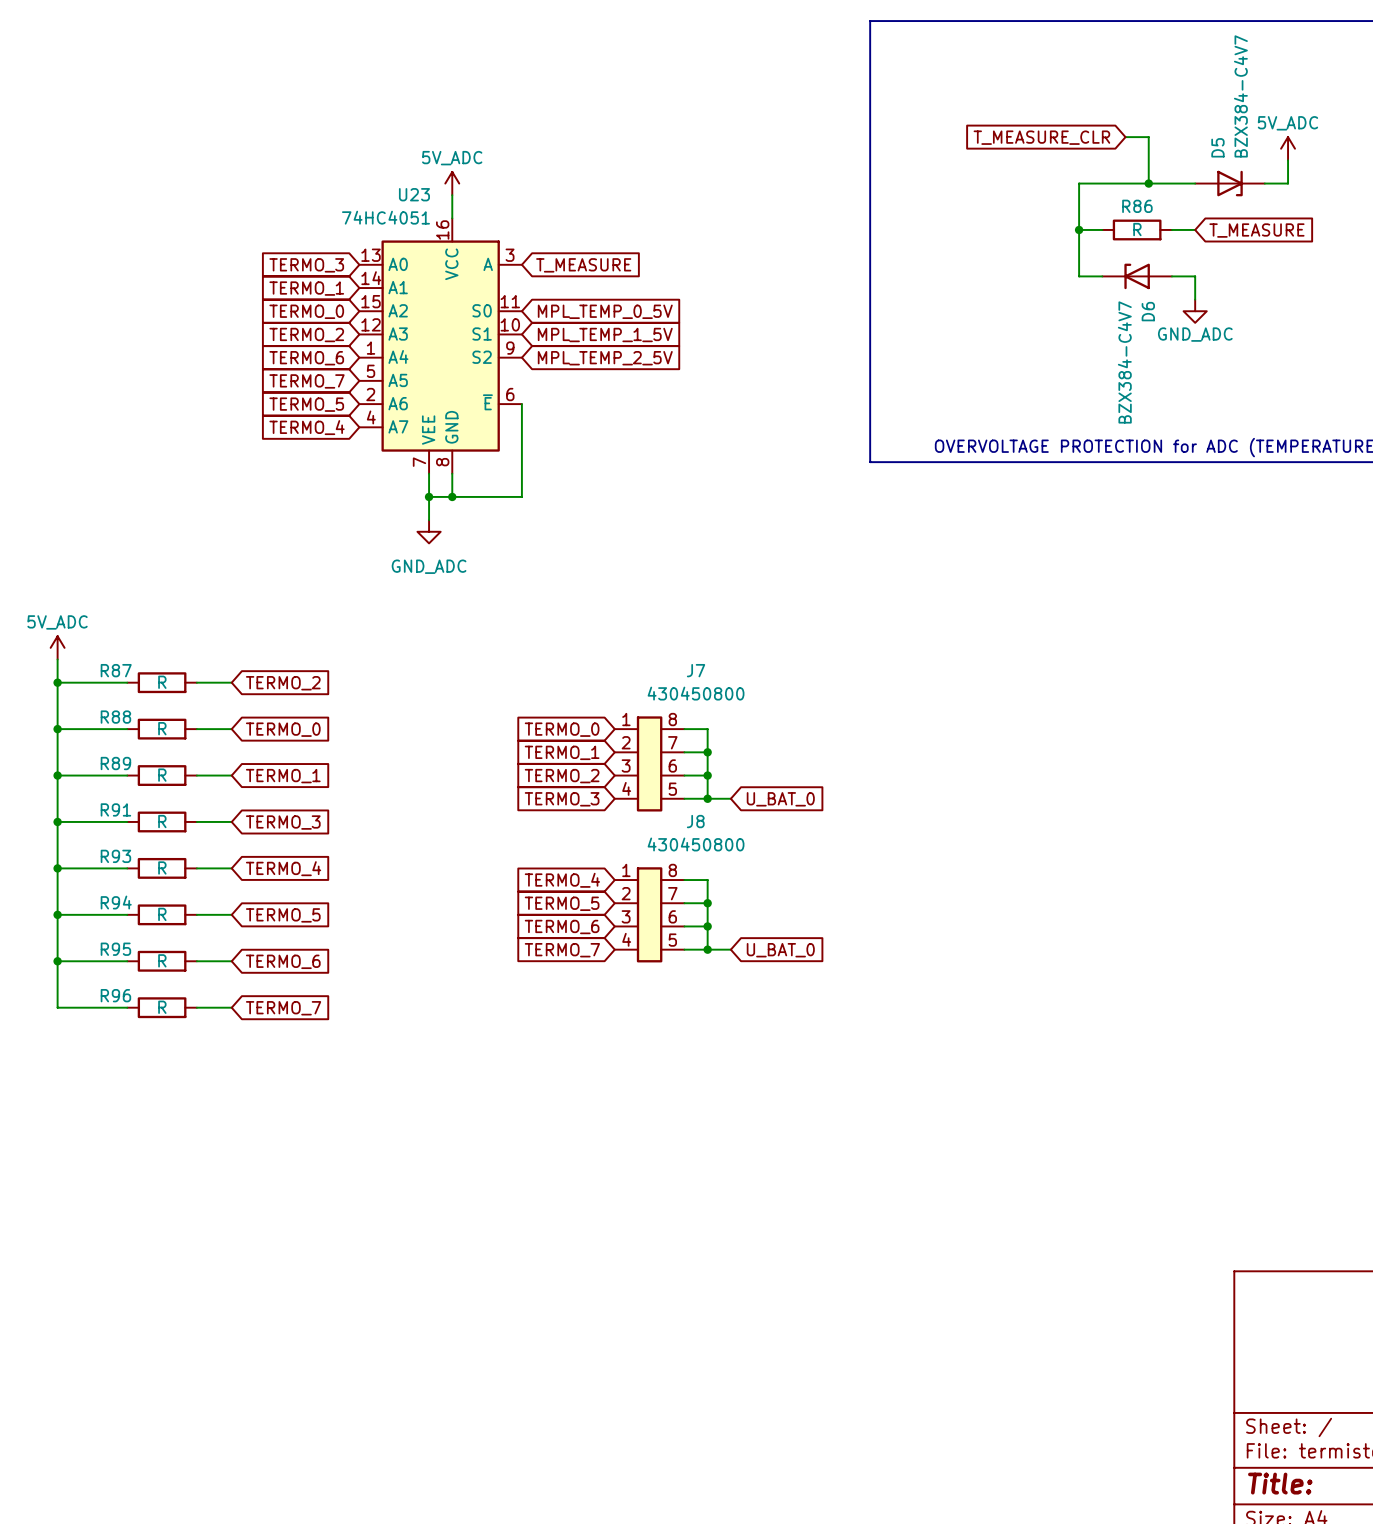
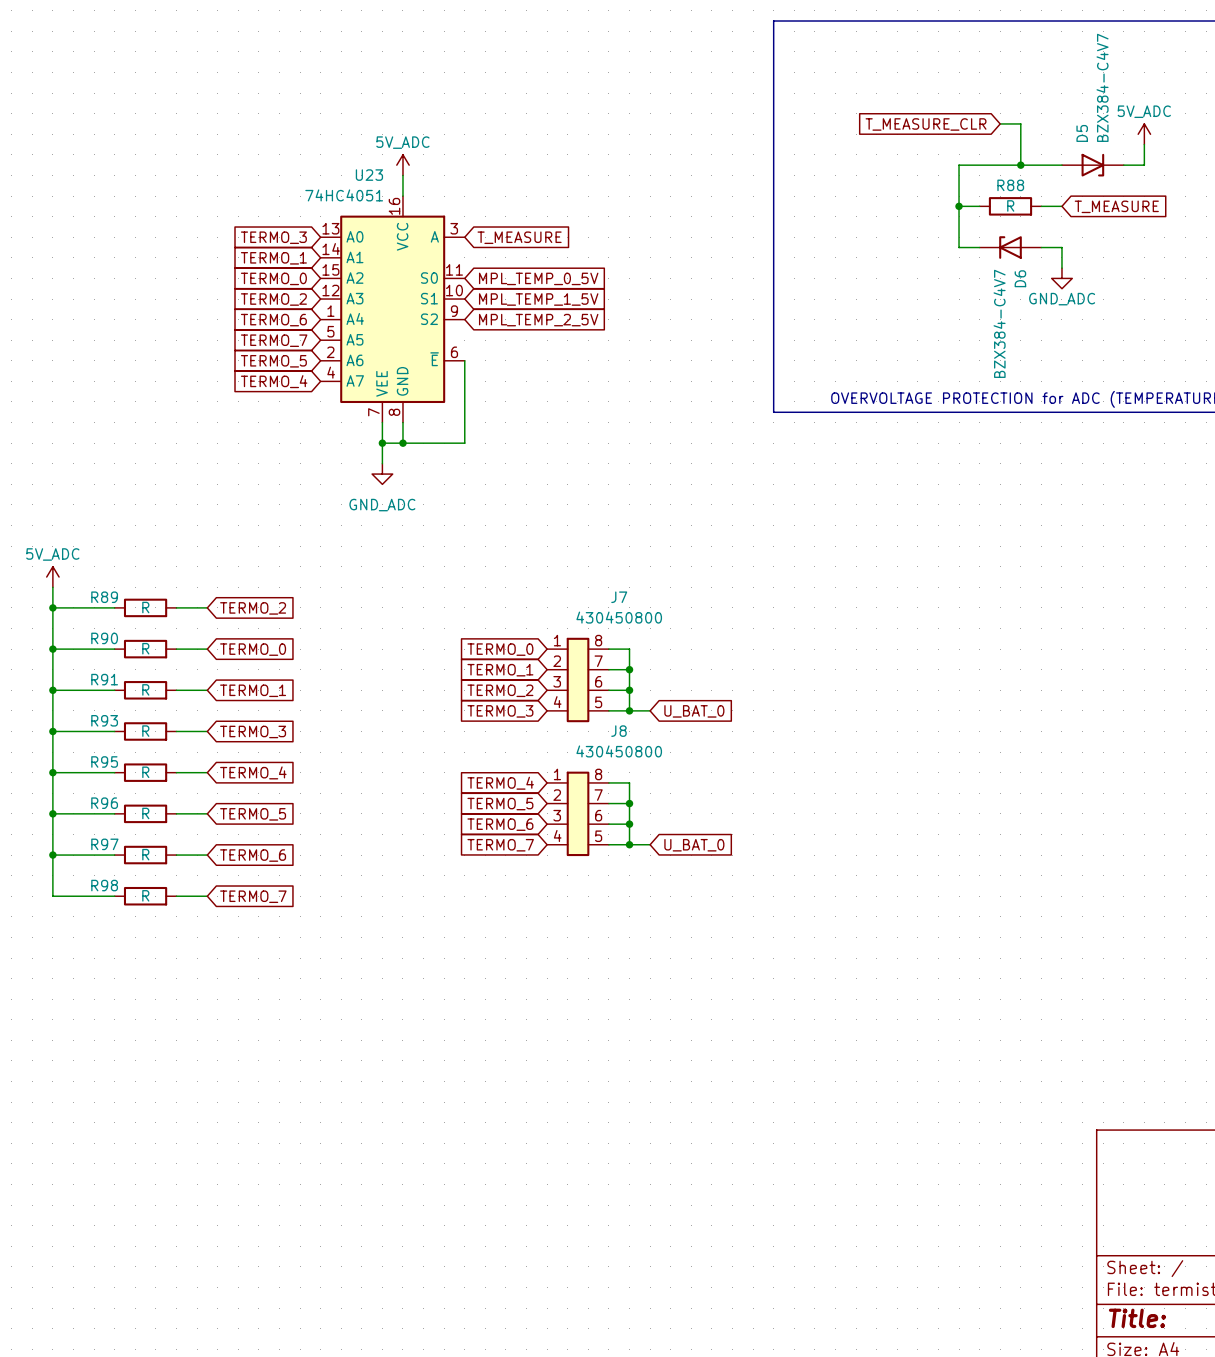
R86 name: R86 (1137, 206) -> R88 (1010, 185)
R87 name: R87 (116, 670) -> R89 (104, 597)
R88 name: R88 (115, 717) -> R90 (104, 638)
R89 name: R89 (115, 763) -> R91 (104, 679)
R91 name: R91 (115, 809) -> R93 (104, 720)
R93 name: R93 (115, 856) -> R95 (104, 761)
R94 name: R94 (116, 902) -> R96 (104, 803)
R95 name: R95 (115, 949) -> R97 (104, 844)
R96 name: R96 (115, 995) -> R98 (104, 885)

